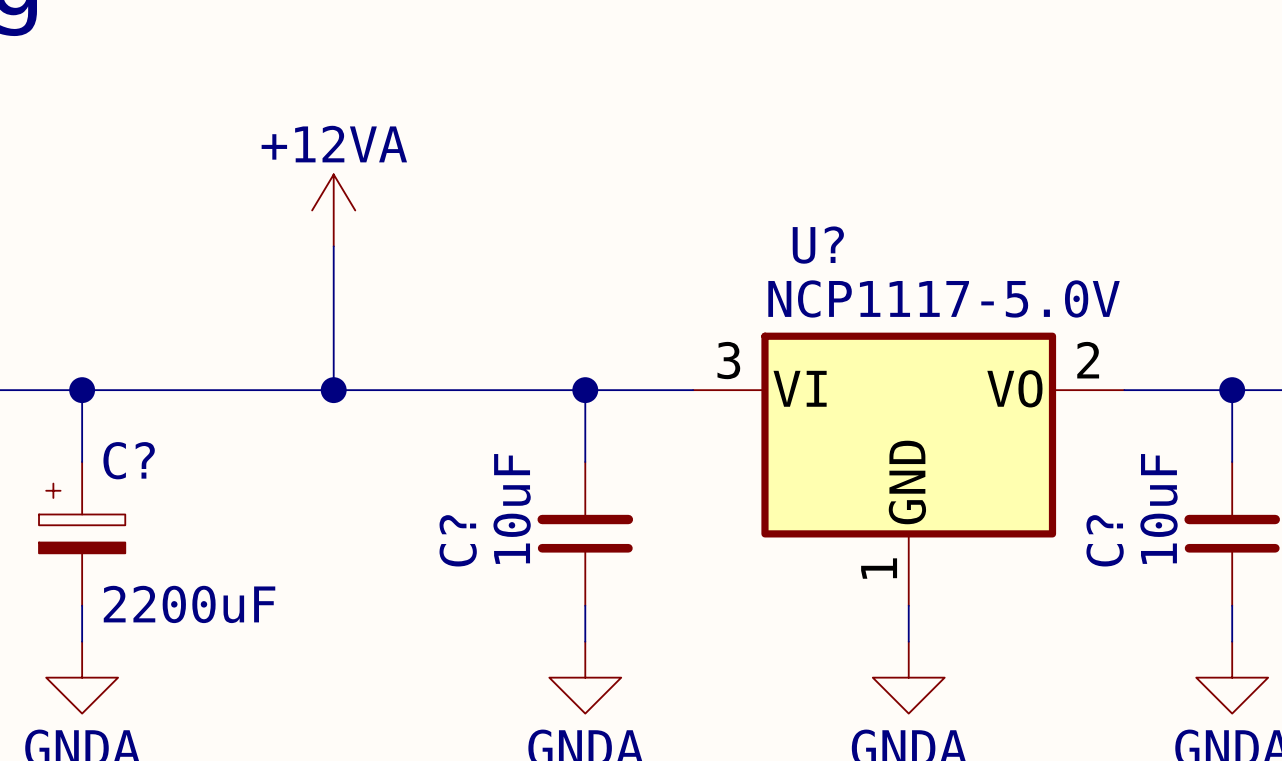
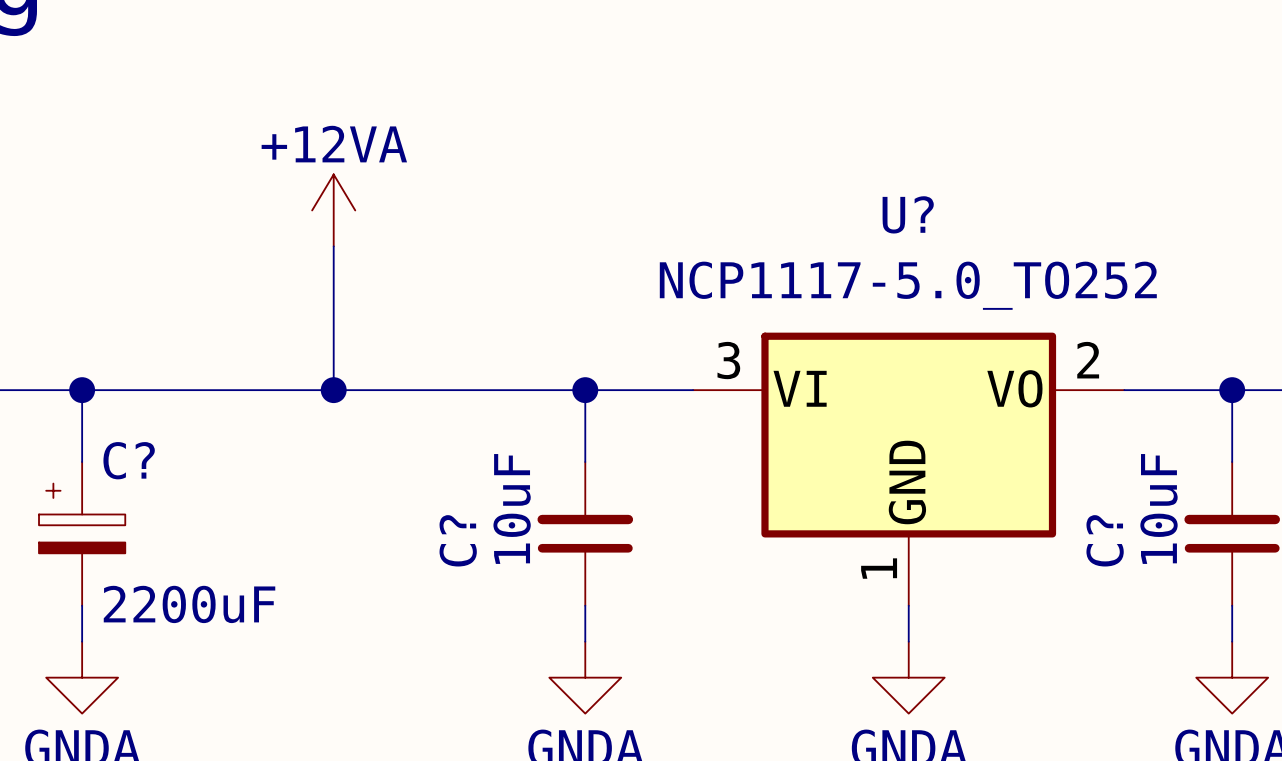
U? name position: U? (818, 245) -> U? (908, 214)
U? value: NCP1117-5.0V (944, 298) -> NCP1117-5.0_TO252 (908, 285)

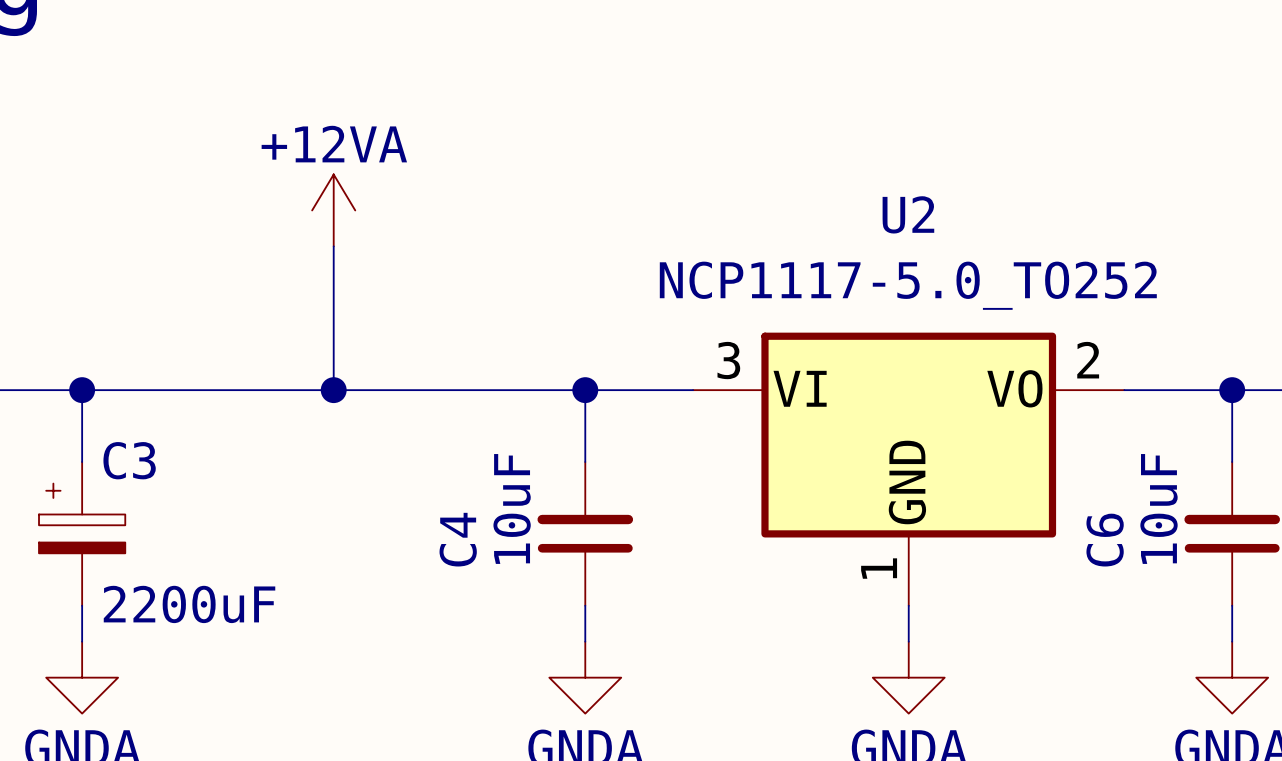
U? name: U? (908, 214) -> U2 (908, 214)
C? name: C? (129, 460) -> C3 (129, 460)
C? name: C? (458, 540) -> C4 (458, 539)
C? name: C? (1105, 540) -> C6 (1105, 540)

